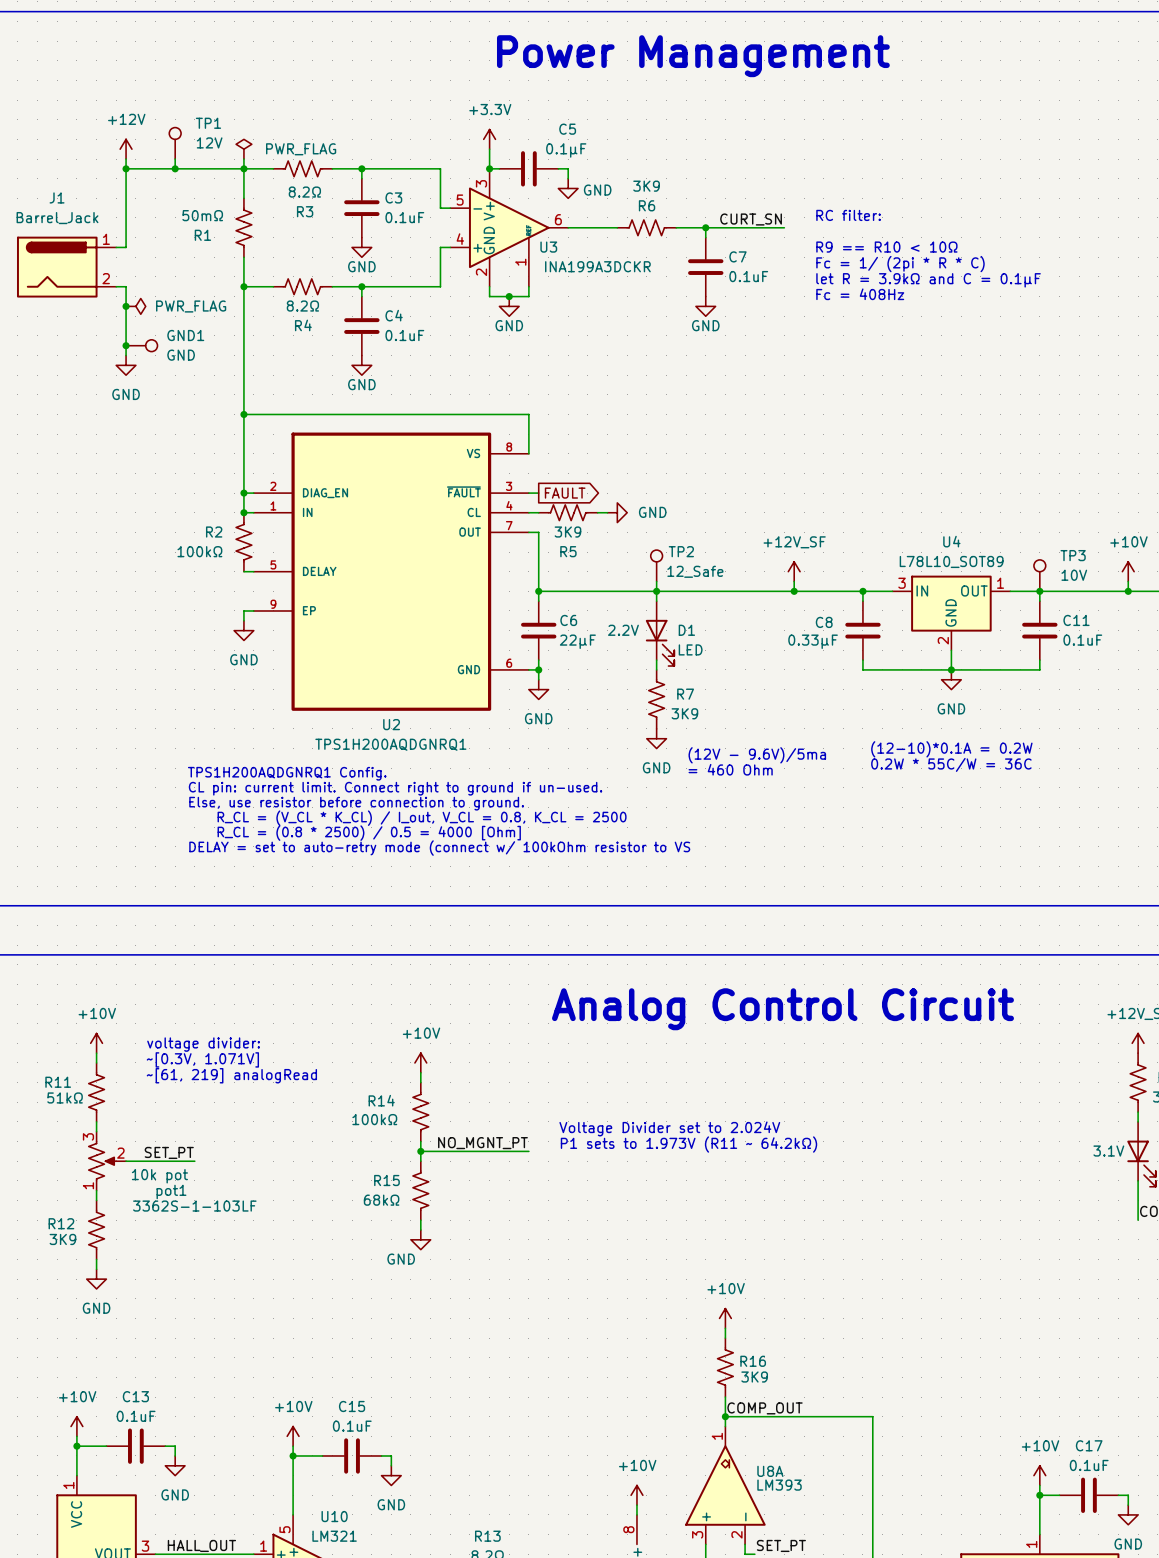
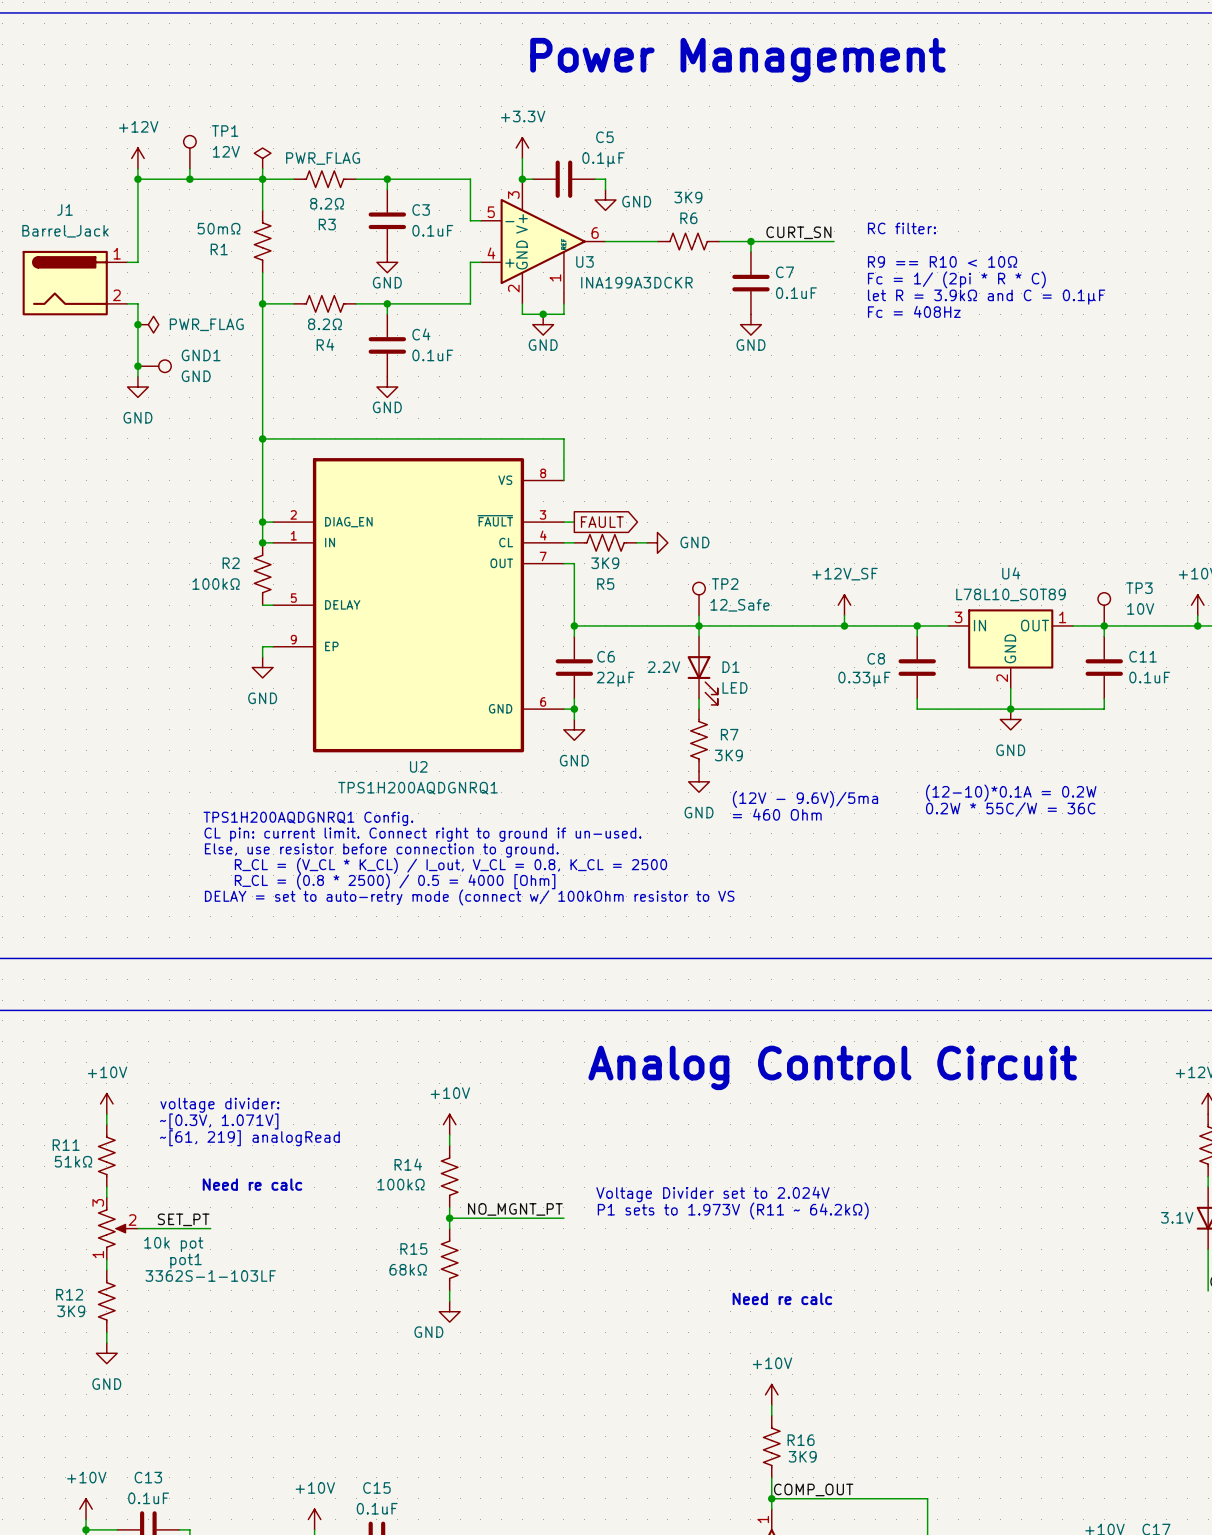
text: none -> Need re calc (252, 1184)
text: none -> Need re calc (782, 1298)

